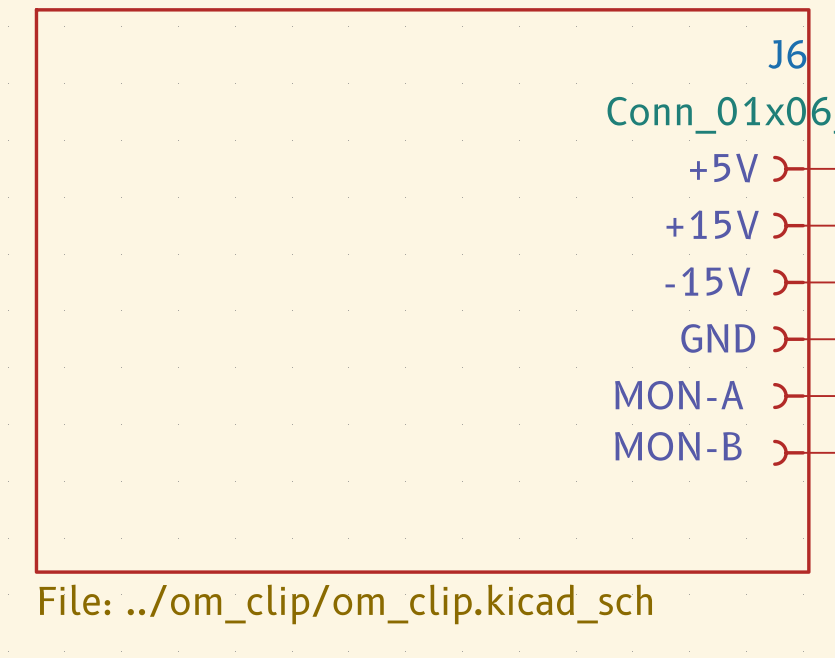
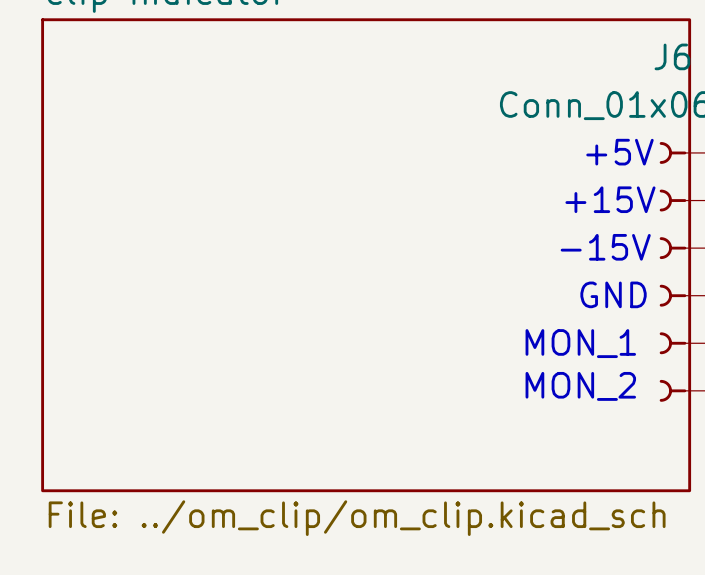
text: MON-A (679, 395) -> MON_1 (580, 343)
text: MON-B (678, 446) -> MON_2 (580, 386)

